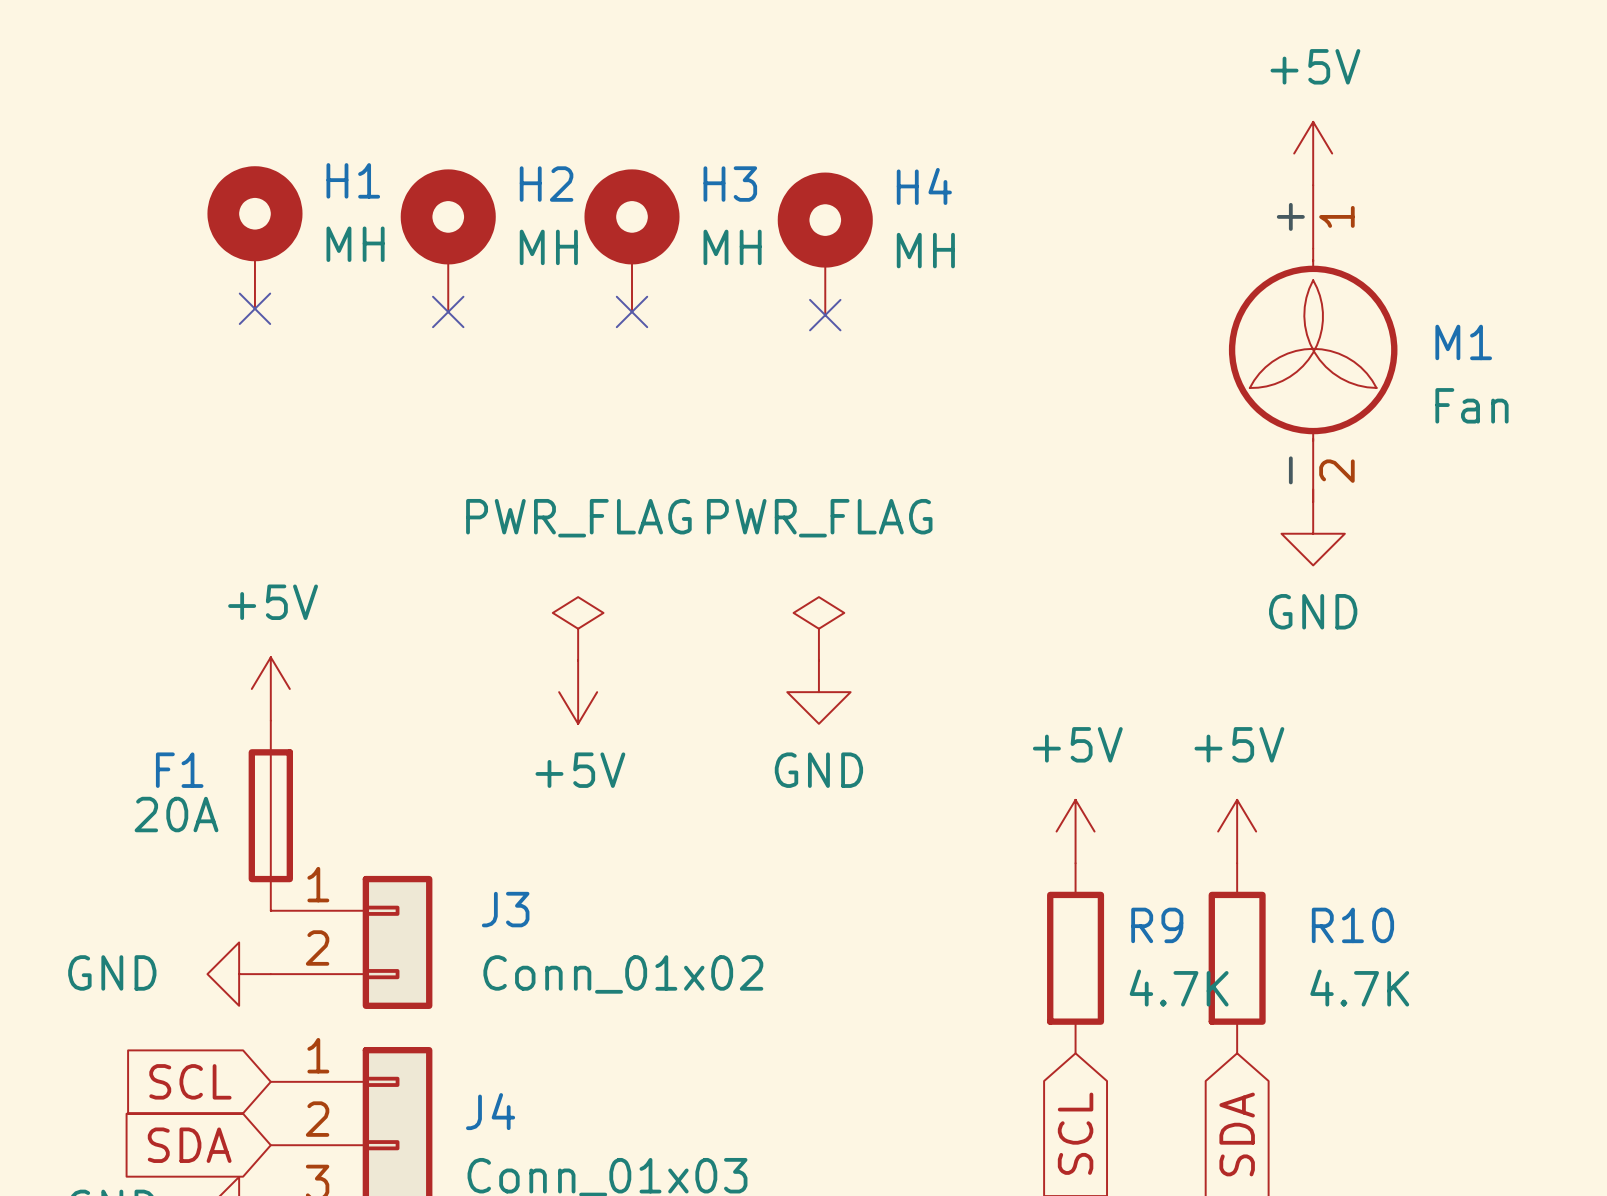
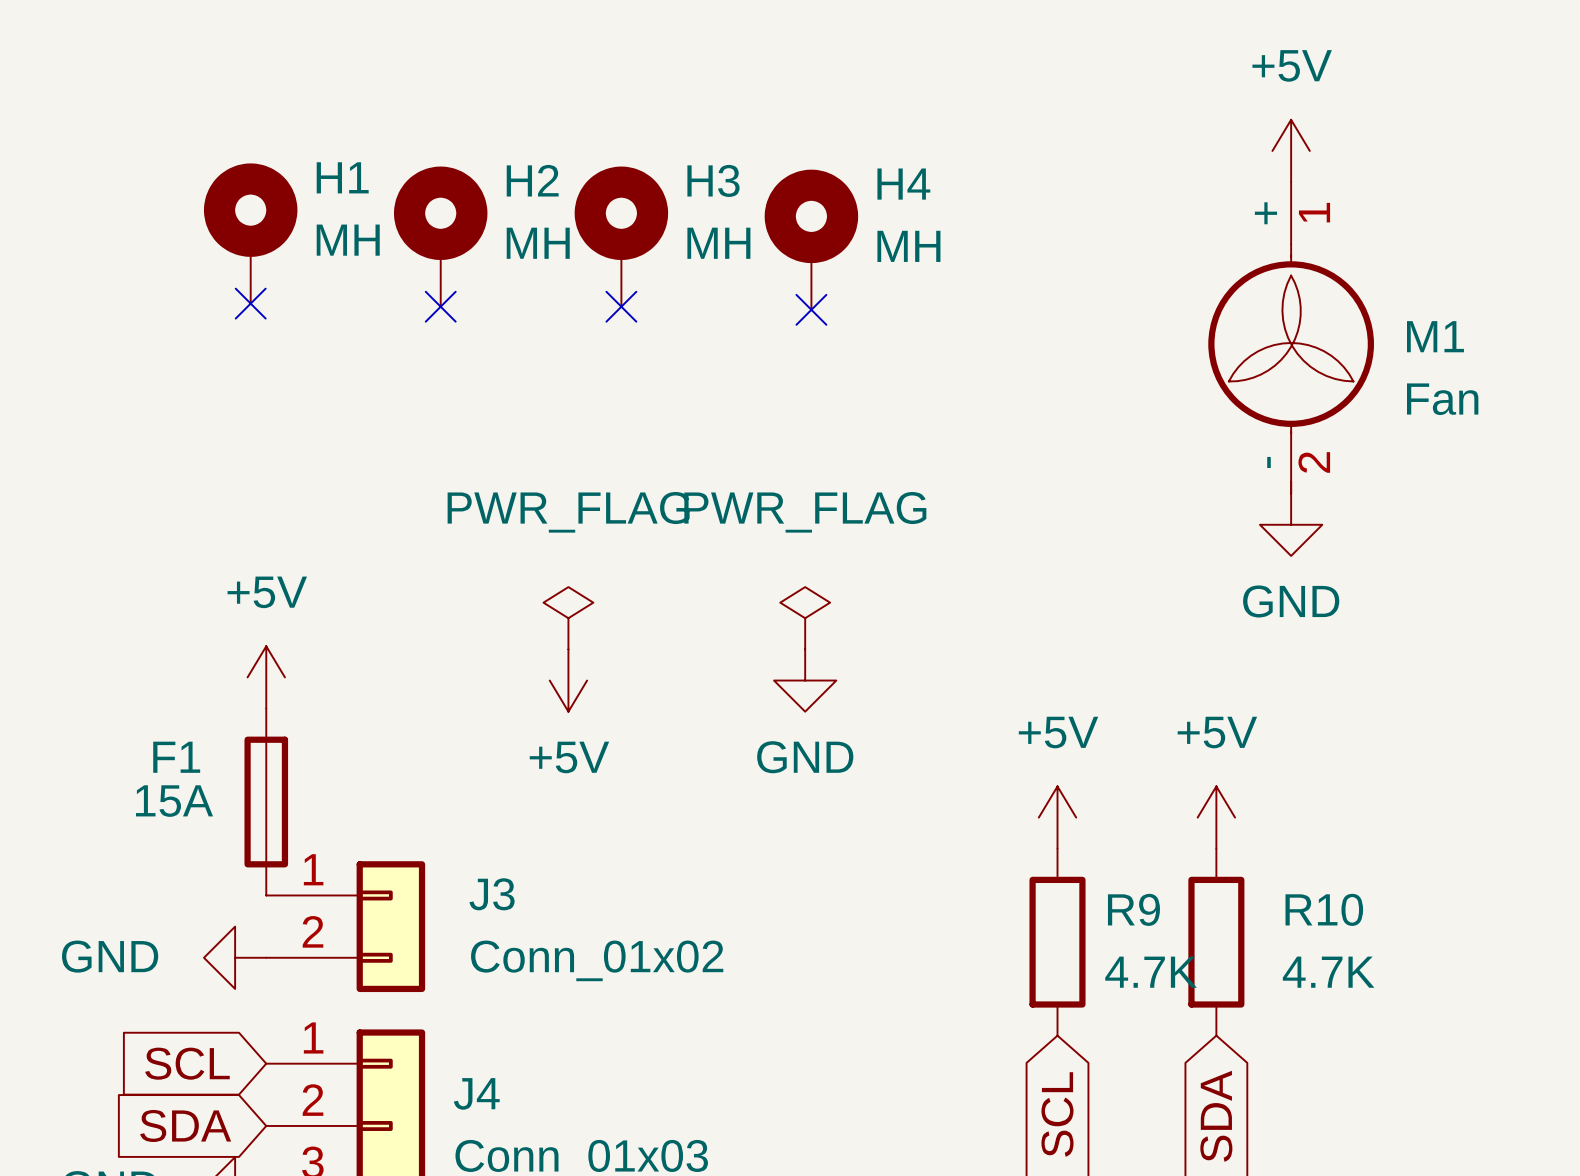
F1 value: 20A (176, 814) -> 15A (174, 801)

